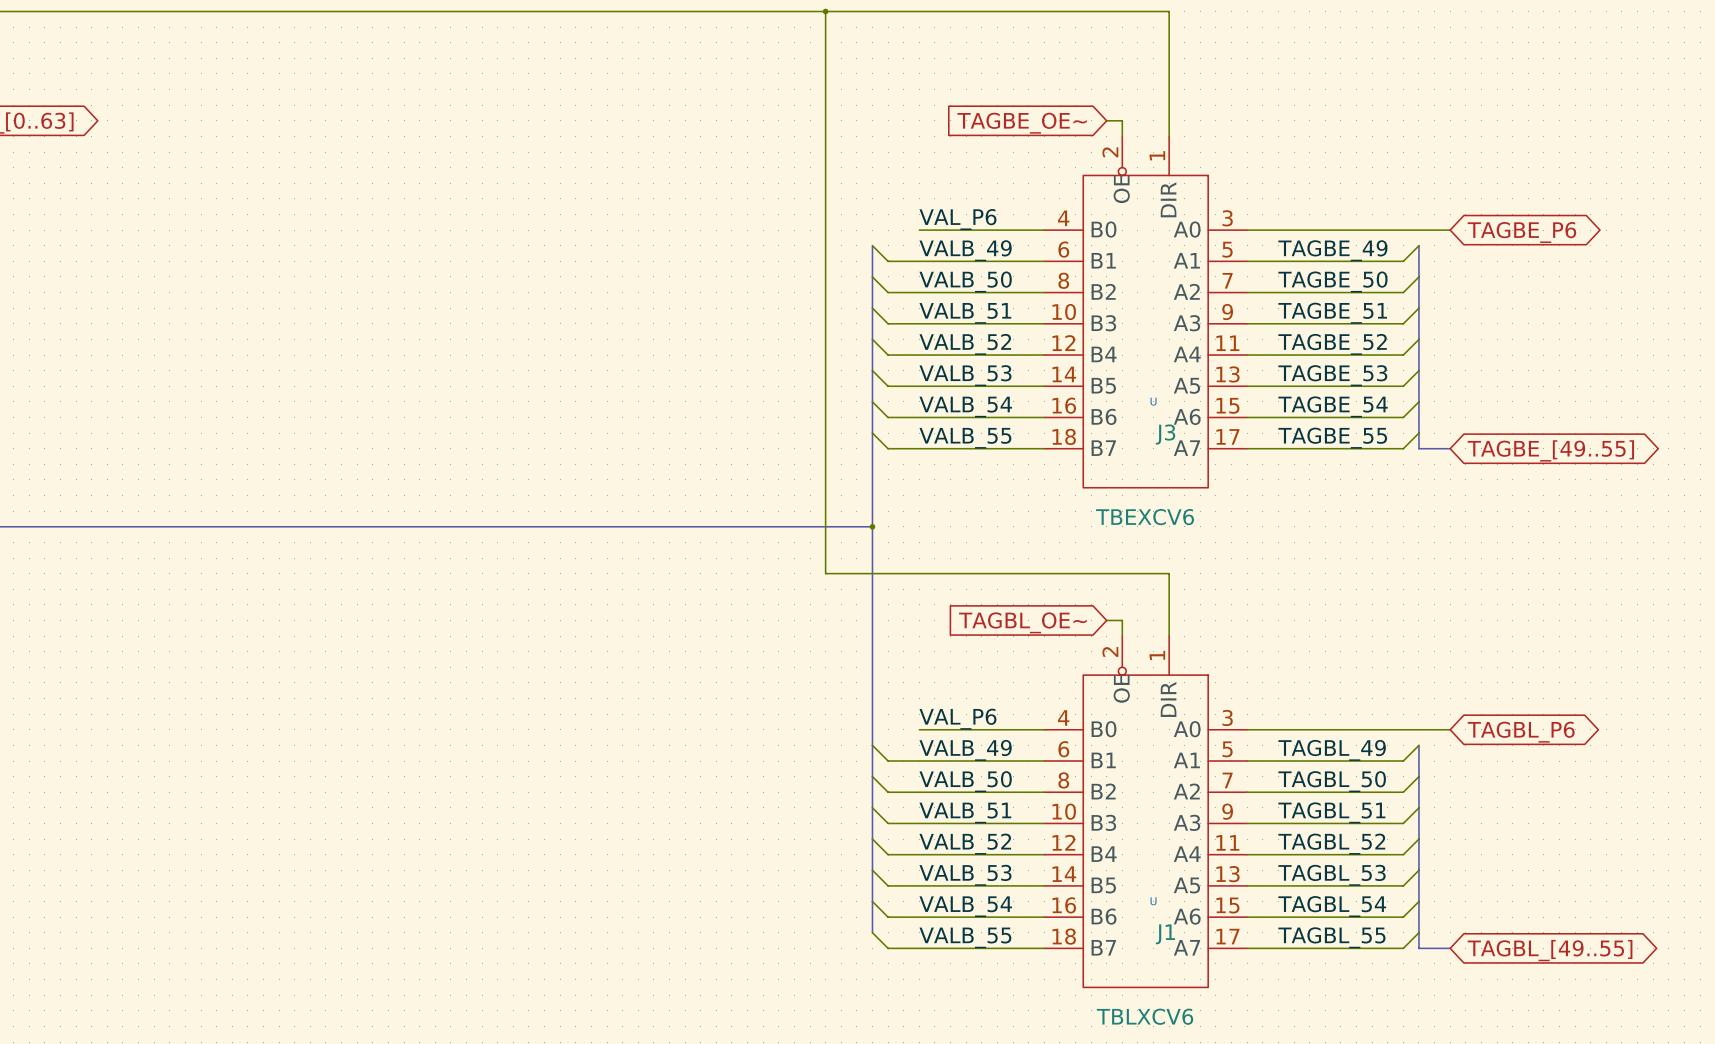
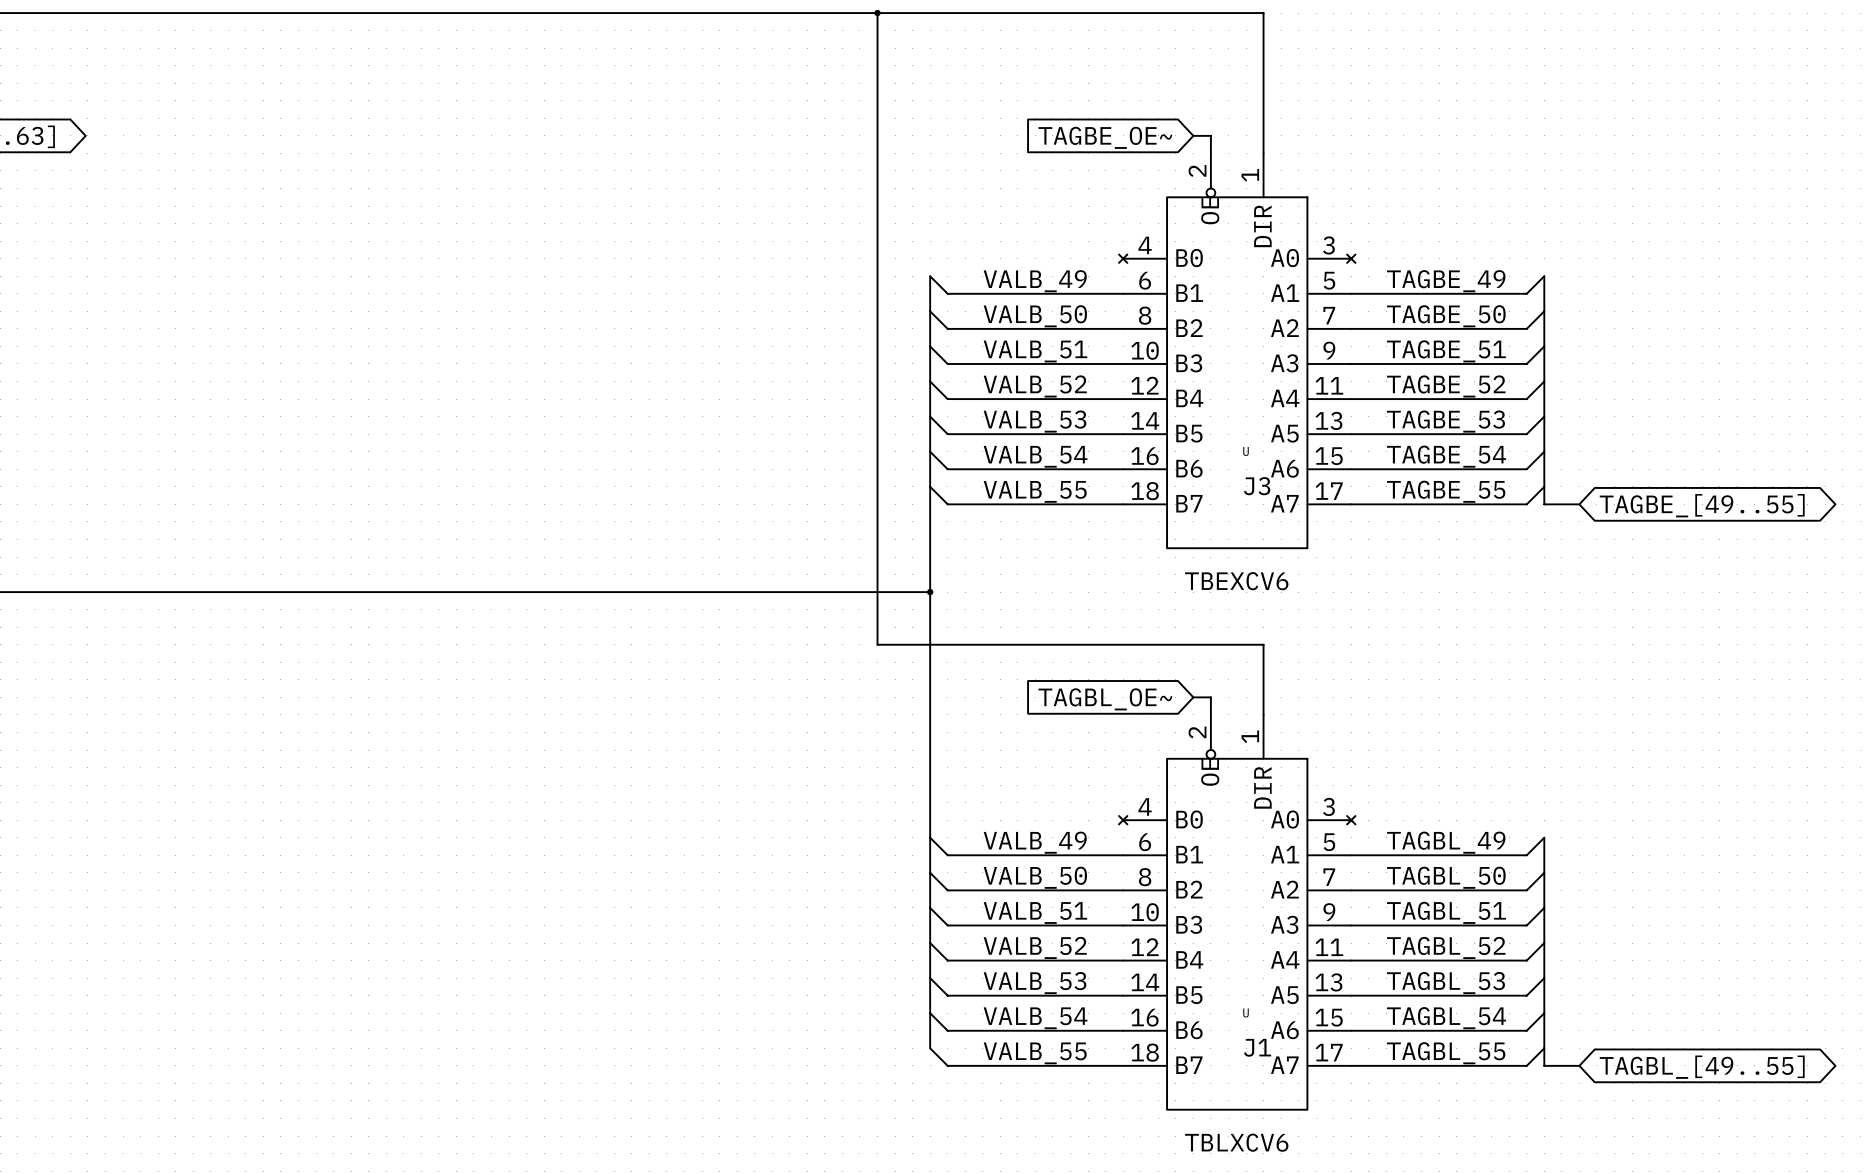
label: VAL_P6 (957, 219) -> none
wire: (919, 230) (1044, 230) -> none
no-connect mark: none -> (1123, 258)
wire: (1247, 230) (1450, 230) -> none
no-connect mark: none -> (1351, 258)
global label: TAGBE_P6 (1521, 232) -> none
label: VAL_P6 (957, 719) -> none
wire: (919, 729) (1044, 729) -> none
no-connect mark: none -> (1123, 820)
wire: (1247, 729) (1450, 729) -> none
no-connect mark: none -> (1351, 820)
global label: TAGBL_P6 (1521, 732) -> none

